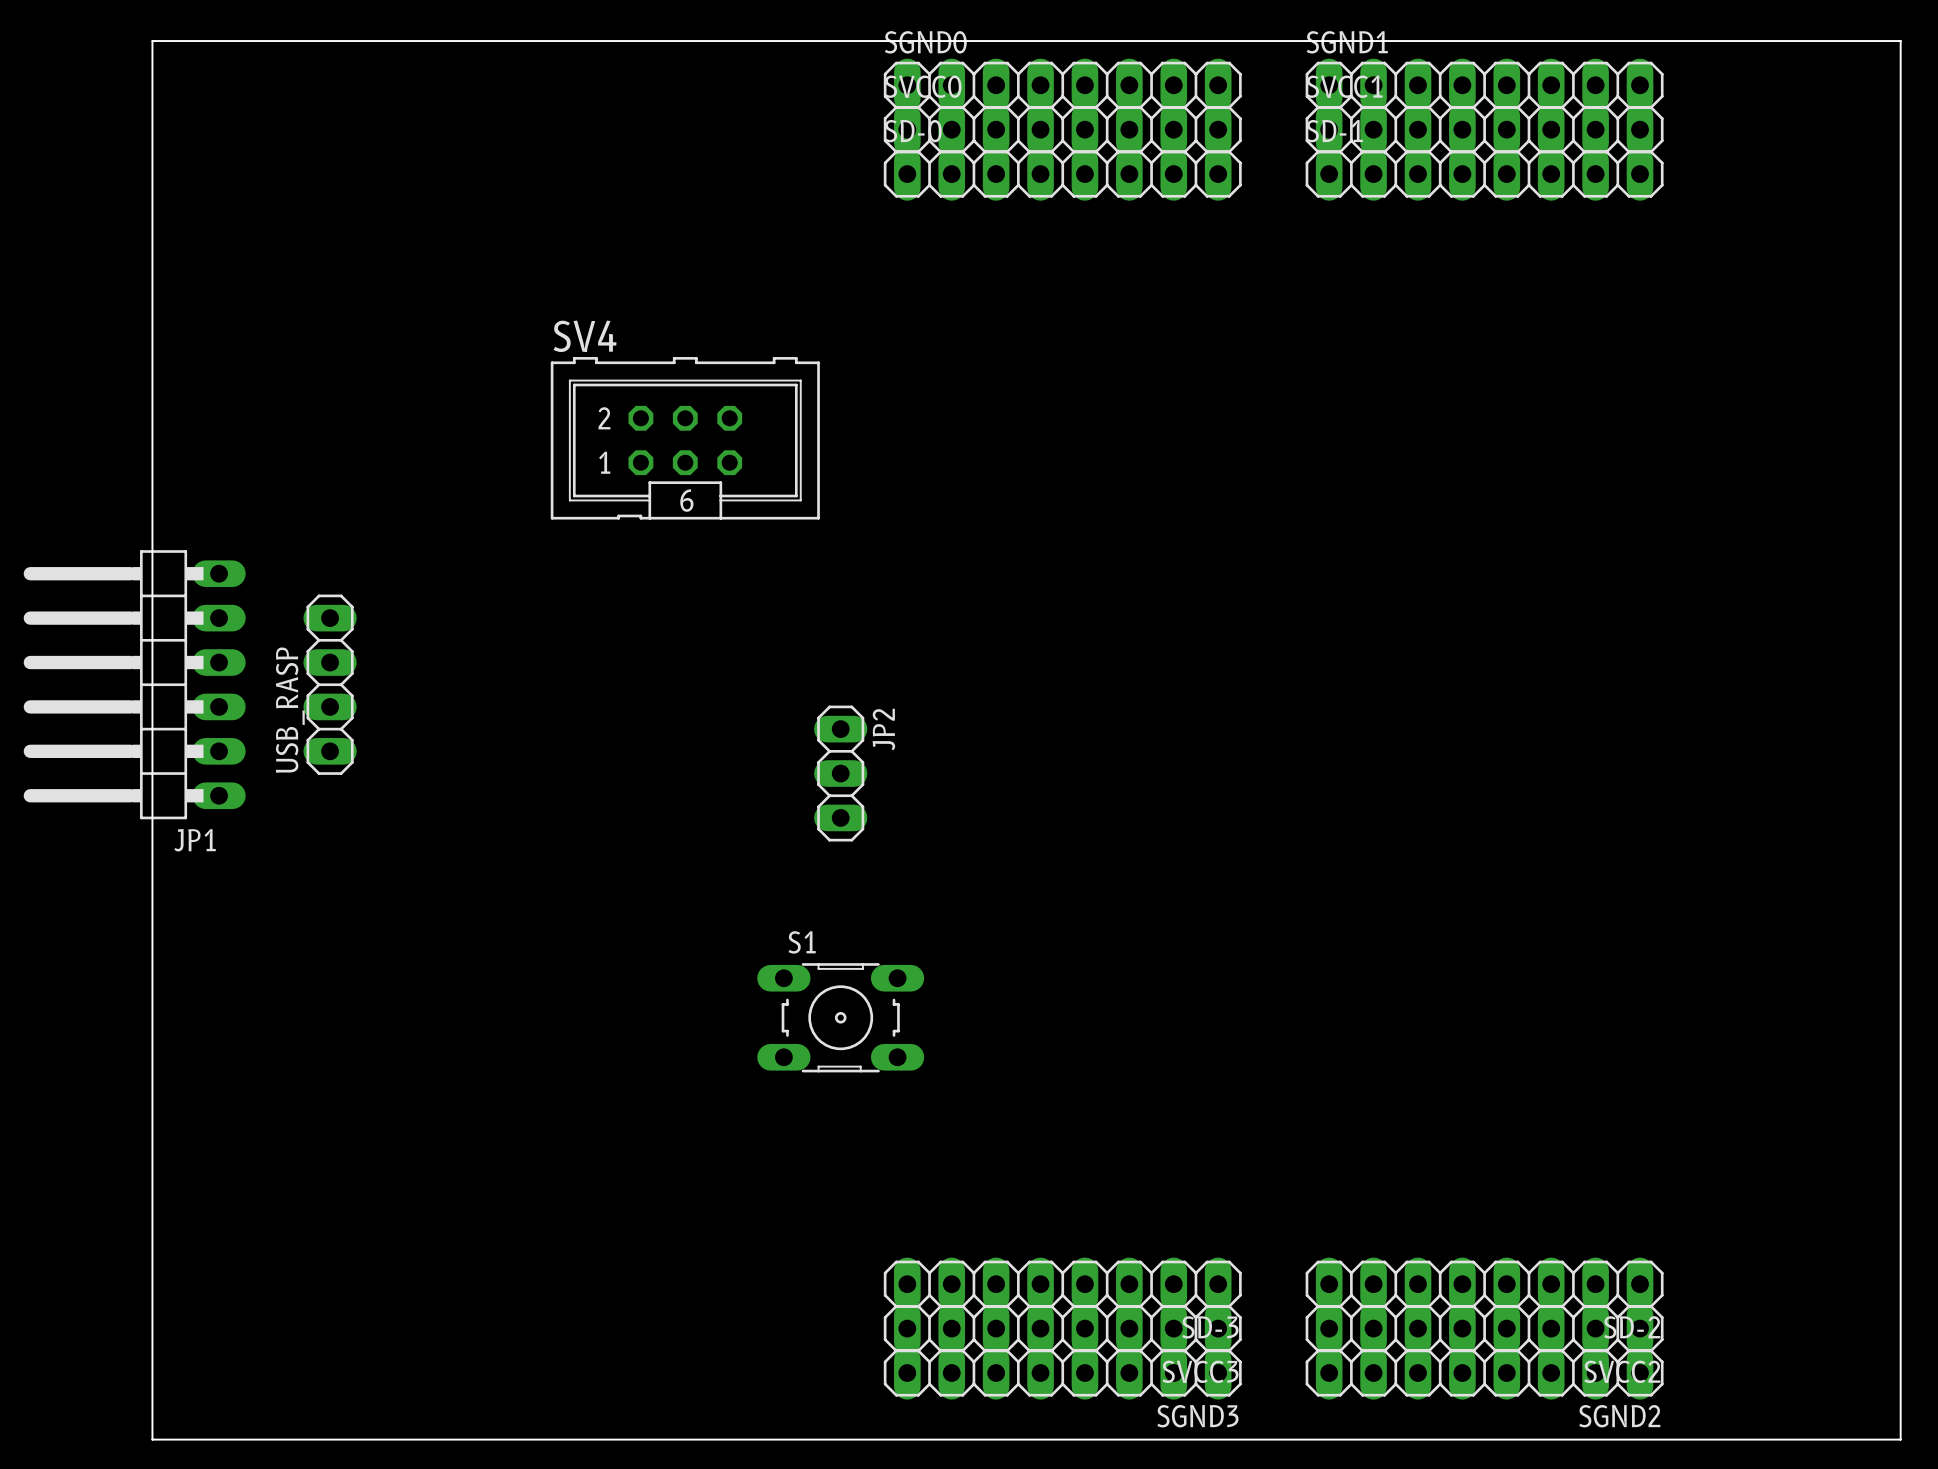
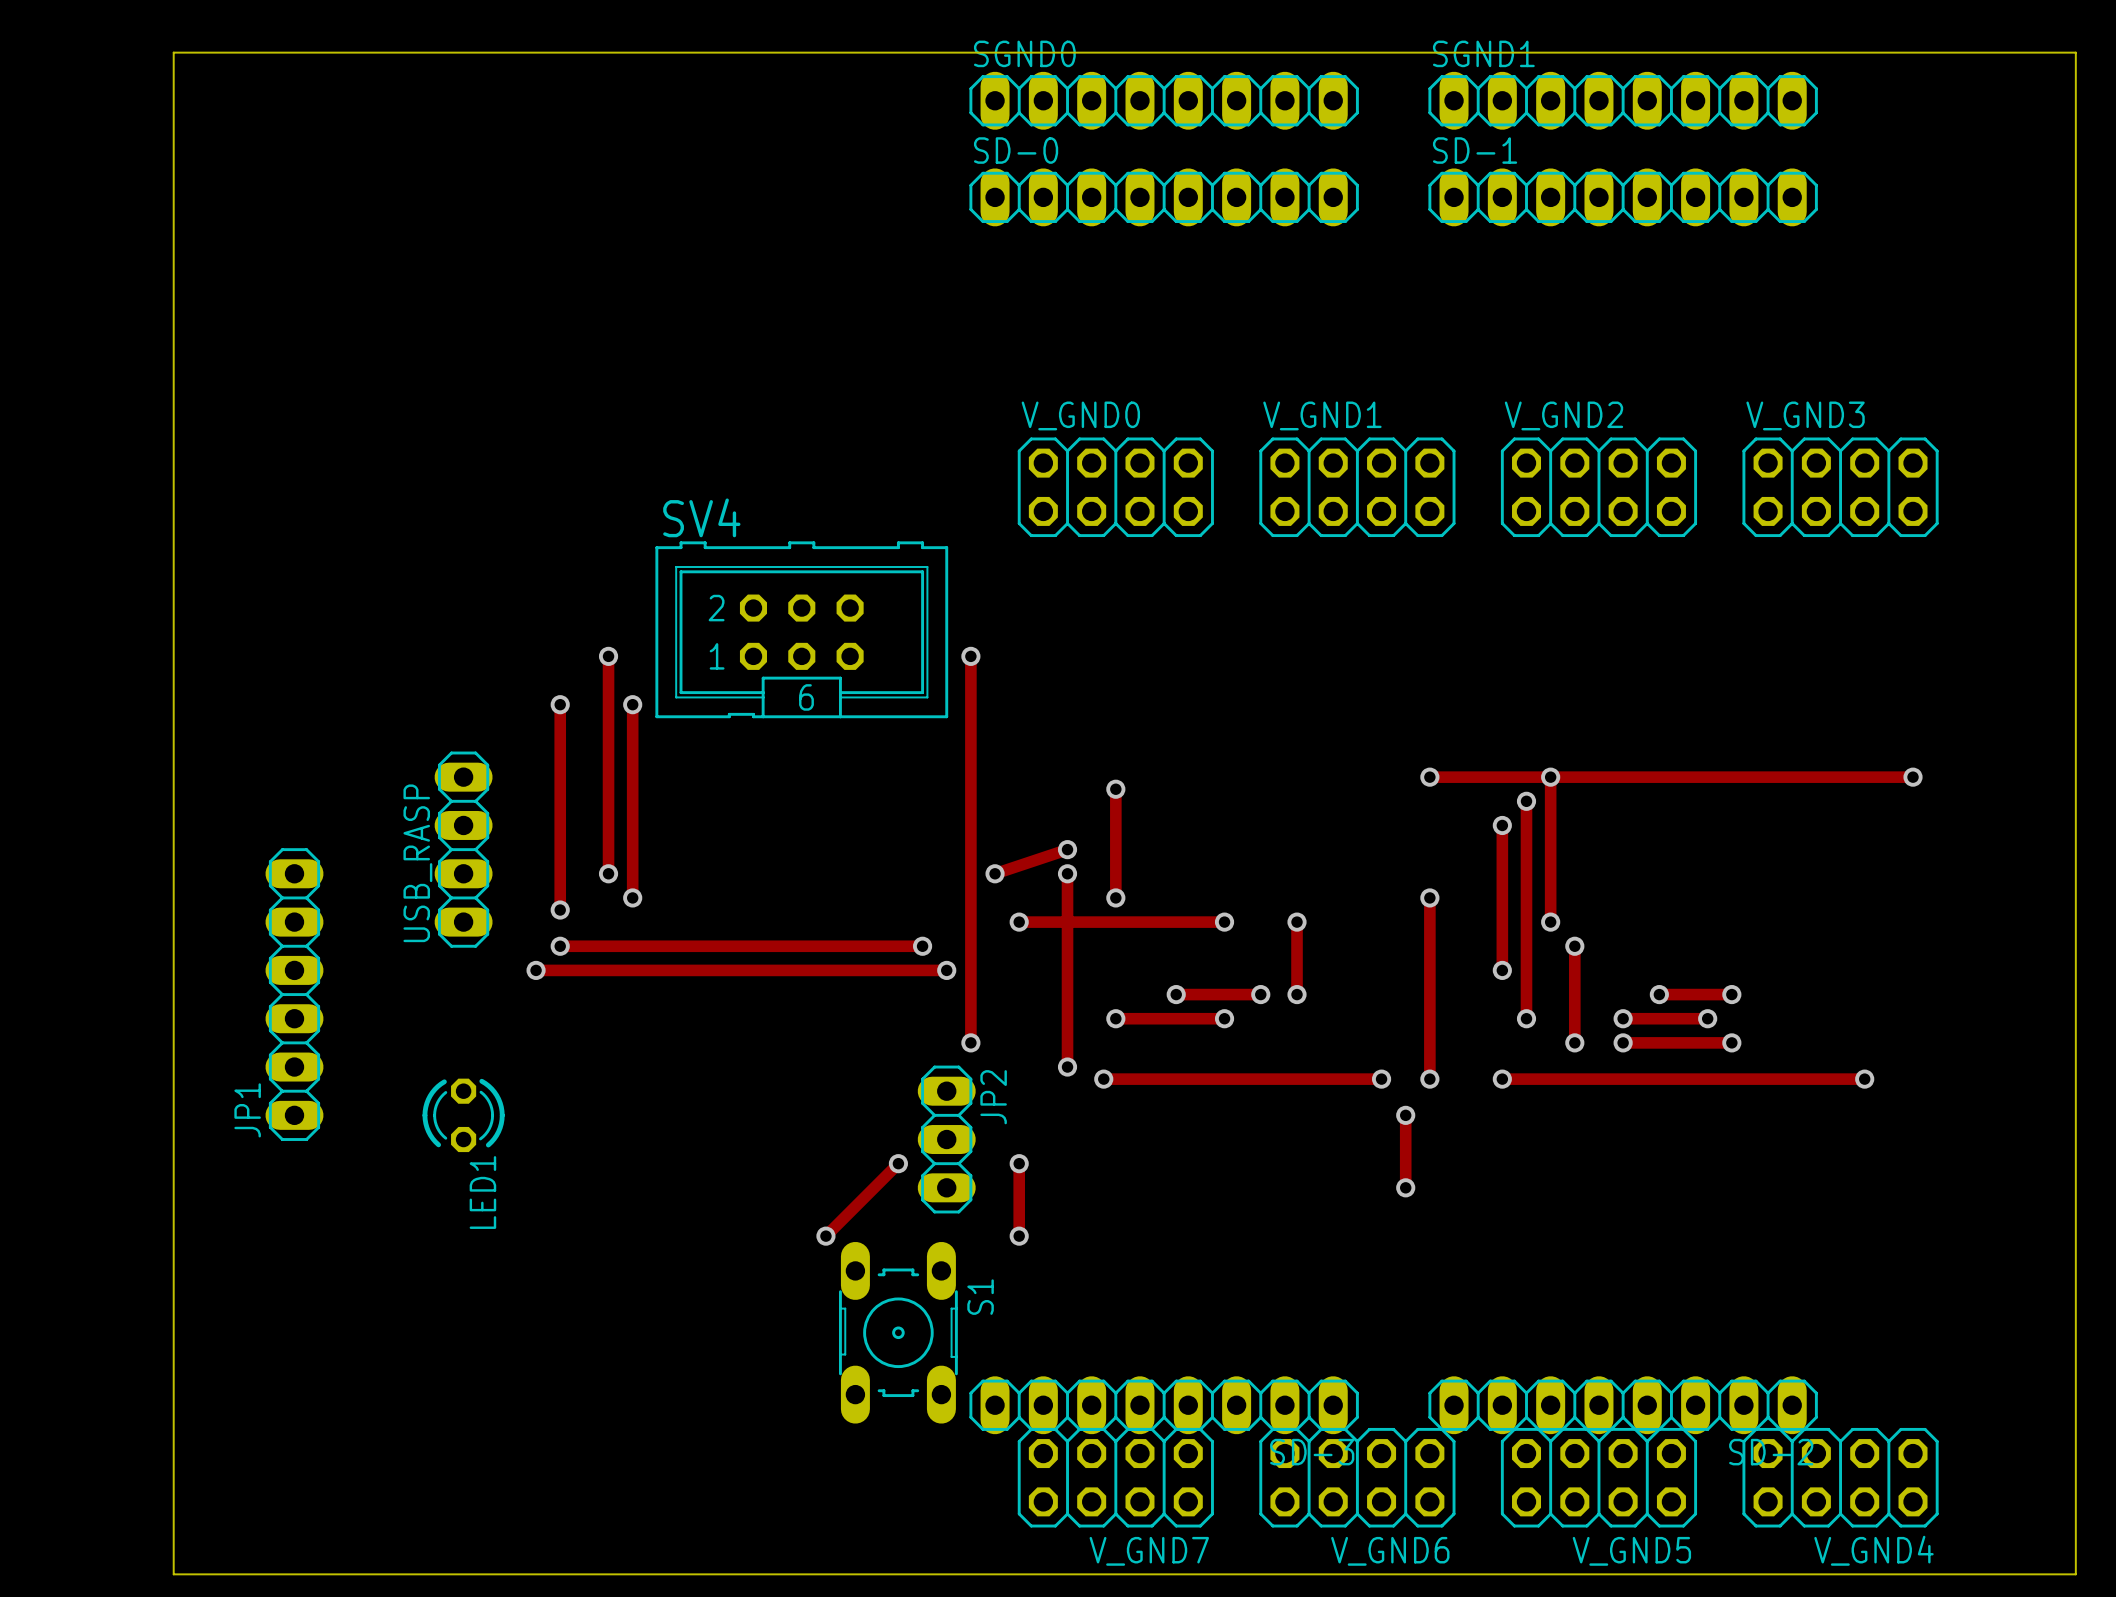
SVCC0: (1062, 129) -> none
SVCC1: (1484, 129) -> none
SV4 position: (685, 438) -> (801, 629)
V_GND0: none -> (1115, 487)
V_GND1: none -> (1357, 487)
V_GND2: none -> (1598, 487)
V_GND3: none -> (1840, 487)
JP1 footprint: [23, 550, 246, 820] -> [265, 848, 324, 1141]
track: none -> (608, 656) (608, 873)
via: none -> (608, 656)
track: none -> (970, 656) (970, 1042)
via: none -> (970, 656)
track: none -> (560, 704) (560, 910)
via: none -> (560, 704)
track: none -> (632, 704) (632, 897)
via: none -> (632, 704)
USB_RASP position: (330, 684) -> (463, 849)
track: none -> (1429, 777) (1913, 777)
via: none -> (1429, 777)
track: none -> (1550, 777) (1550, 922)
via: none -> (1550, 777)
via: none -> (1913, 777)
track: none -> (1115, 789) (1115, 897)
via: none -> (1115, 789)
track: none -> (1526, 801) (1526, 1018)
via: none -> (1526, 801)
track: none -> (1502, 825) (1502, 970)
via: none -> (1502, 825)
JP2 position: (840, 773) -> (946, 1139)
track: none -> (1067, 849) (995, 873)
via: none -> (1067, 849)
via: none -> (608, 873)
via: none -> (995, 873)
track: none -> (1067, 873) (1067, 1067)
via: none -> (1067, 873)
via: none -> (632, 897)
via: none -> (1115, 897)
track: none -> (1429, 897) (1429, 1079)
via: none -> (1429, 897)
via: none -> (560, 910)
JP1 name position: JP1 (195, 840) -> JP1 (247, 1110)
track: none -> (1019, 922) (1224, 922)
via: none -> (1019, 922)
via: none -> (1224, 922)
track: none -> (1297, 922) (1297, 994)
via: none -> (1297, 922)
via: none -> (1550, 922)
track: none -> (560, 946) (922, 946)
via: none -> (560, 946)
via: none -> (922, 946)
track: none -> (1574, 946) (1574, 1042)
via: none -> (1574, 946)
track: none -> (536, 970) (946, 970)
via: none -> (536, 970)
via: none -> (946, 970)
via: none -> (1502, 970)
track: none -> (1176, 994) (1260, 994)
via: none -> (1176, 994)
via: none -> (1260, 994)
via: none -> (1297, 994)
track: none -> (1659, 994) (1731, 994)
via: none -> (1659, 994)
via: none -> (1731, 994)
track: none -> (1115, 1018) (1224, 1018)
via: none -> (1115, 1018)
via: none -> (1224, 1018)
via: none -> (1526, 1018)
track: none -> (1623, 1018) (1707, 1018)
via: none -> (1623, 1018)
via: none -> (1707, 1018)
via: none -> (970, 1042)
via: none -> (1574, 1042)
track: none -> (1623, 1042) (1731, 1042)
via: none -> (1623, 1042)
via: none -> (1731, 1042)
via: none -> (1067, 1067)
track: none -> (1103, 1079) (1381, 1079)
via: none -> (1103, 1079)
via: none -> (1381, 1079)
via: none -> (1429, 1079)
track: none -> (1502, 1079) (1864, 1079)
via: none -> (1502, 1079)
via: none -> (1864, 1079)
LED1: none -> (463, 1115)
S1 rotation: 0° (840, 1017) -> 90° clockwise (898, 1332)
S1 position: (840, 1017) -> (898, 1332)
track: none -> (1405, 1115) (1405, 1187)
via: none -> (1405, 1115)
track: none -> (898, 1163) (825, 1236)
via: none -> (898, 1163)
track: none -> (1019, 1163) (1019, 1236)
via: none -> (1019, 1163)
via: none -> (1405, 1187)
via: none -> (825, 1236)
via: none -> (1019, 1236)
SVCC3: (1062, 1328) -> none
SVCC2: (1484, 1328) -> none
V_GND7: none -> (1115, 1477)
V_GND6: none -> (1357, 1477)
V_GND5: none -> (1598, 1477)
V_GND4: none -> (1840, 1477)
SGND3: (1062, 1373) -> none
SGND2: (1484, 1373) -> none

